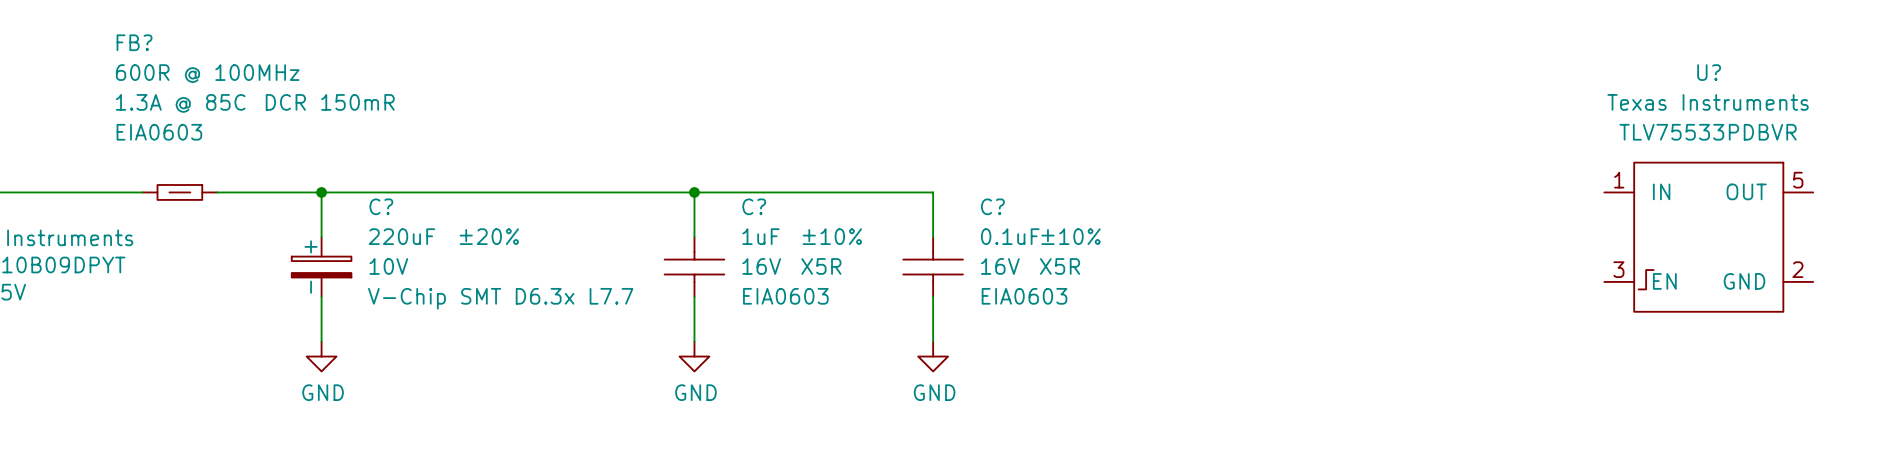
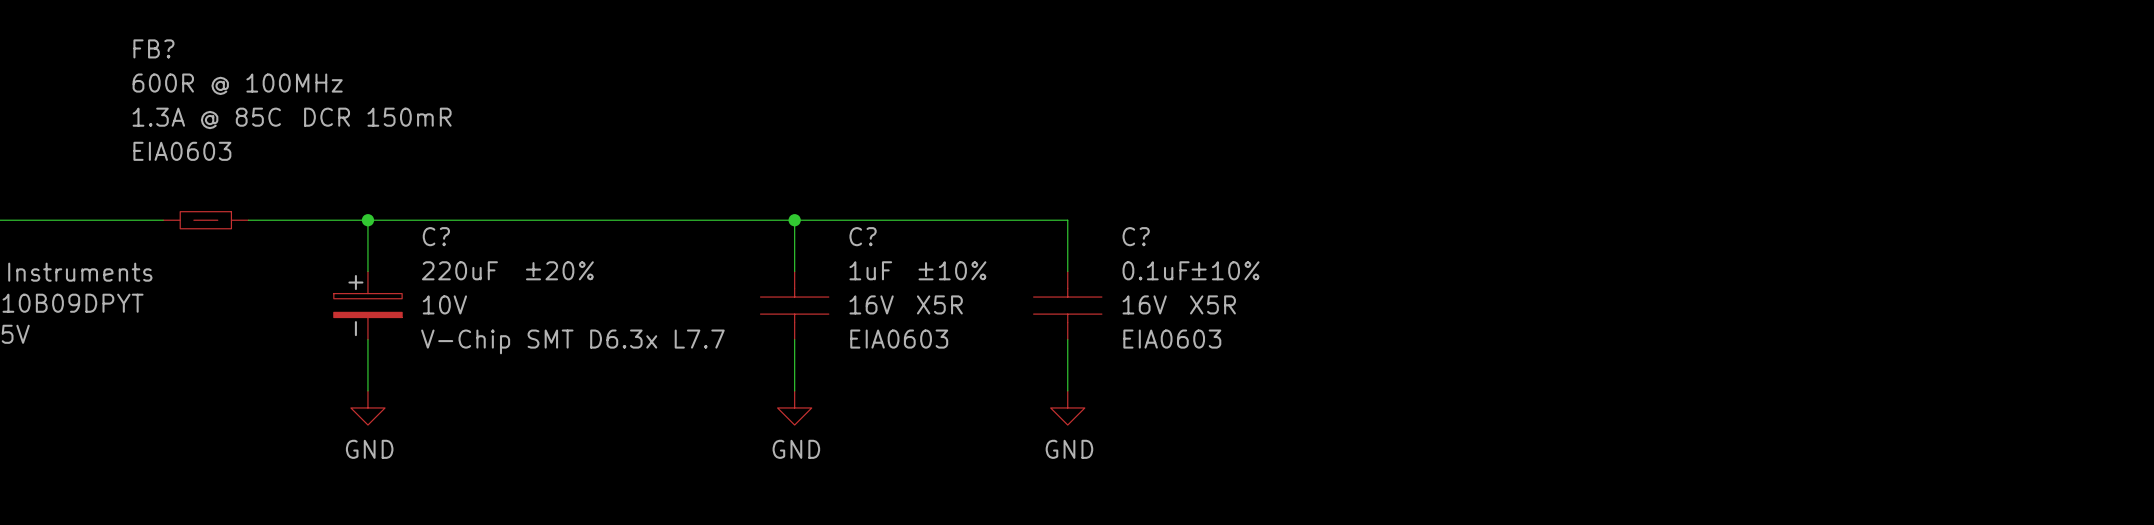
U?: (1708, 237) -> none

